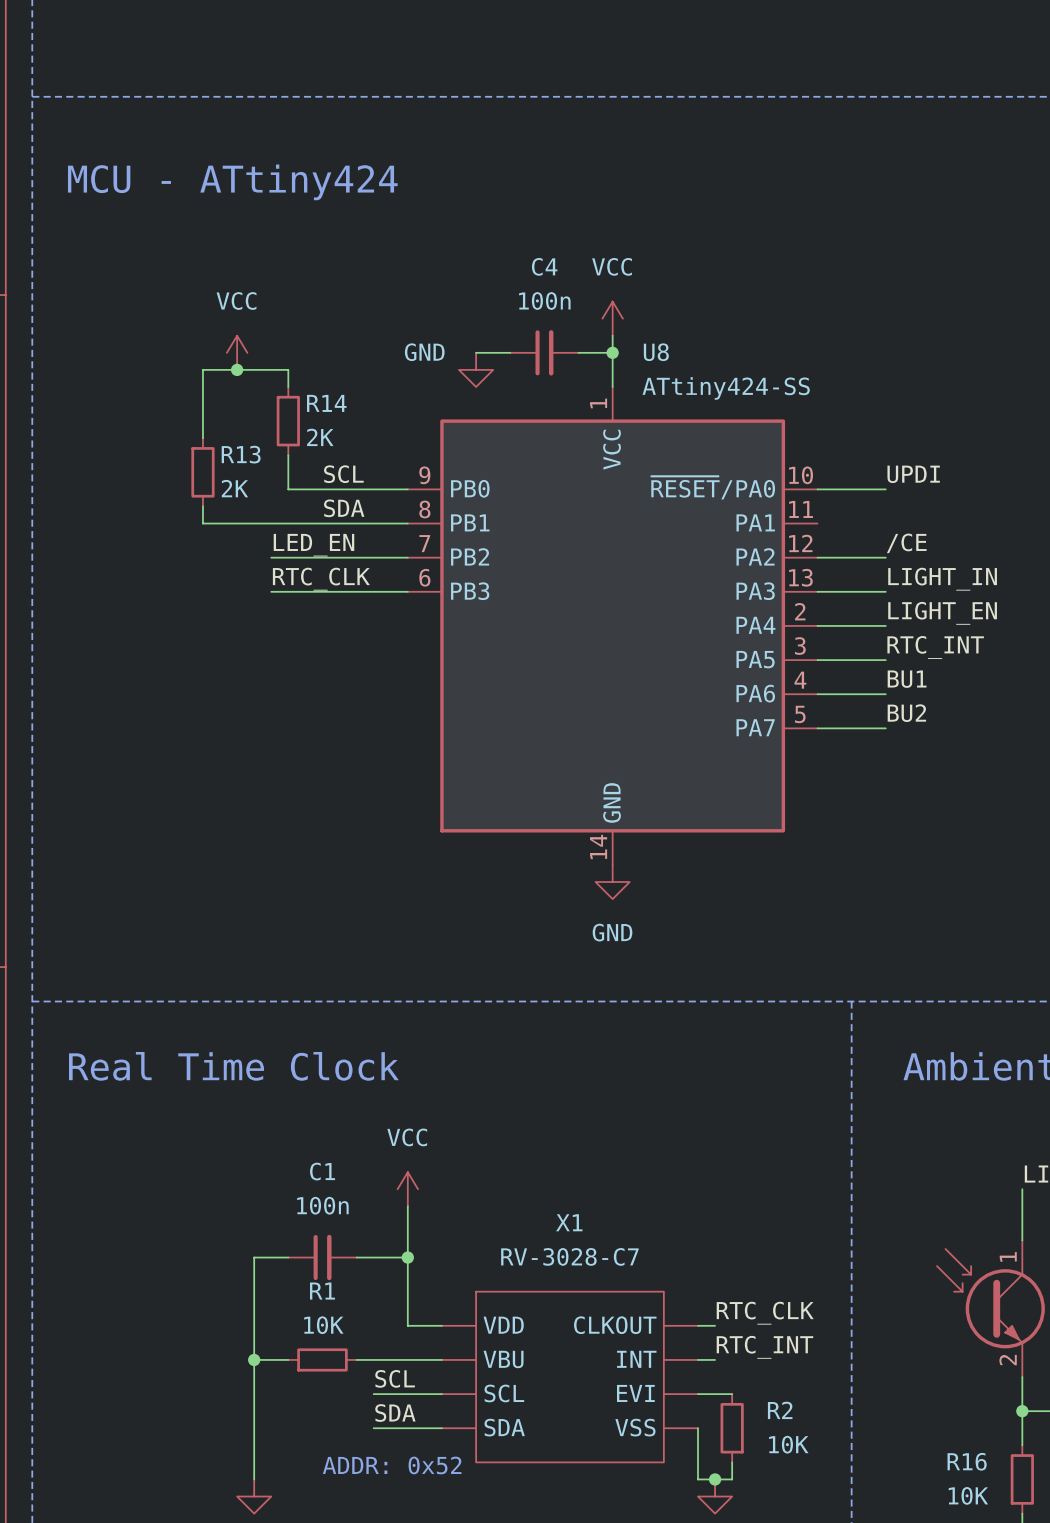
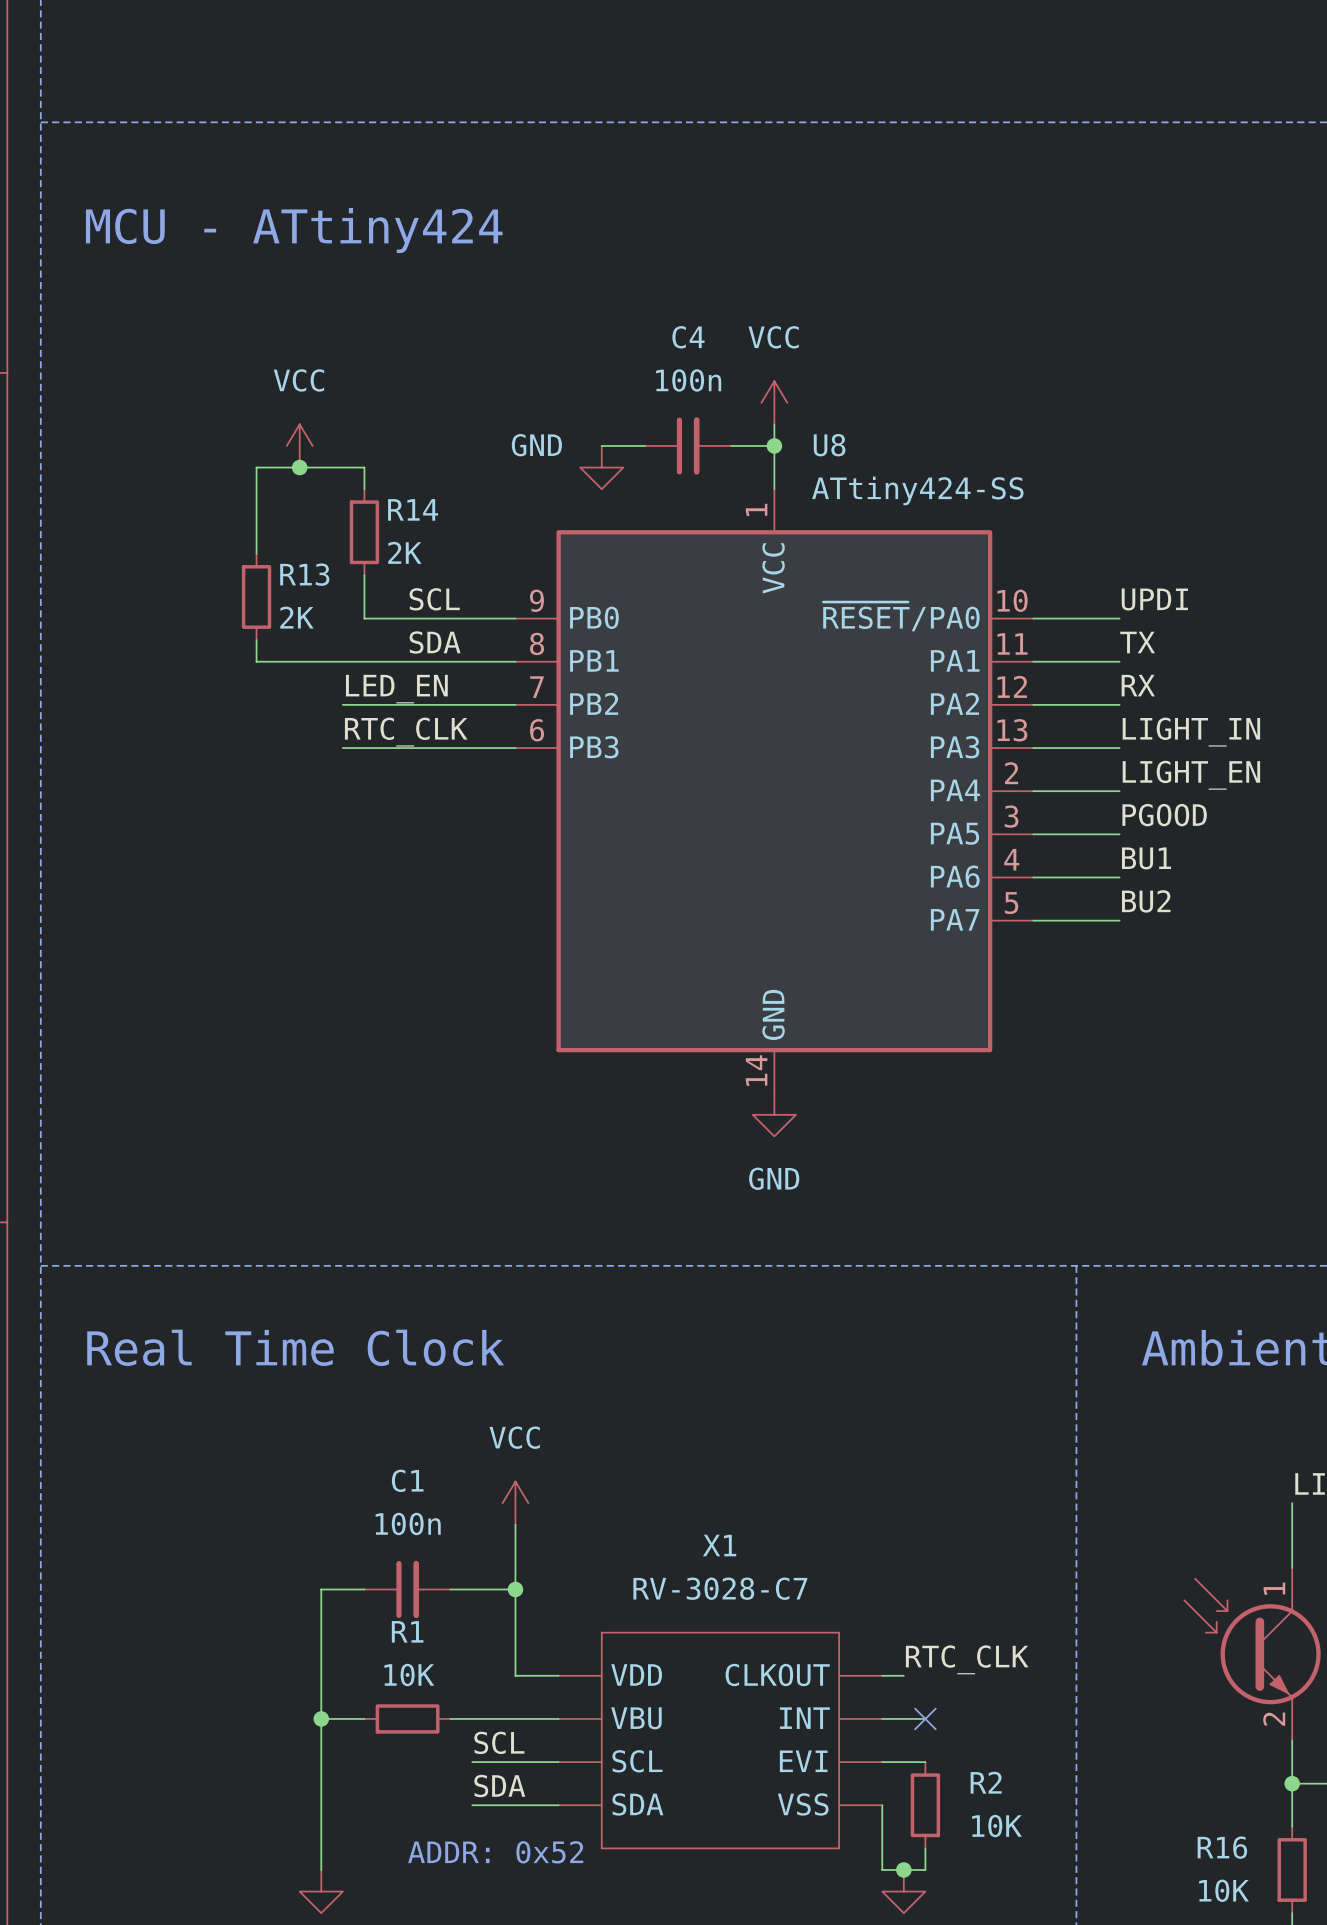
label: none -> TX (1137, 642)
wire: none -> (1033, 661) (1119, 661)
label: /CE (906, 543) -> RX (1138, 685)
label: RTC_INT (935, 647) -> PGOOD (1164, 815)
label: RTC_INT (764, 1347) -> none
wire: none -> (903, 1718) (925, 1718)
no-connect mark: none -> (925, 1718)

